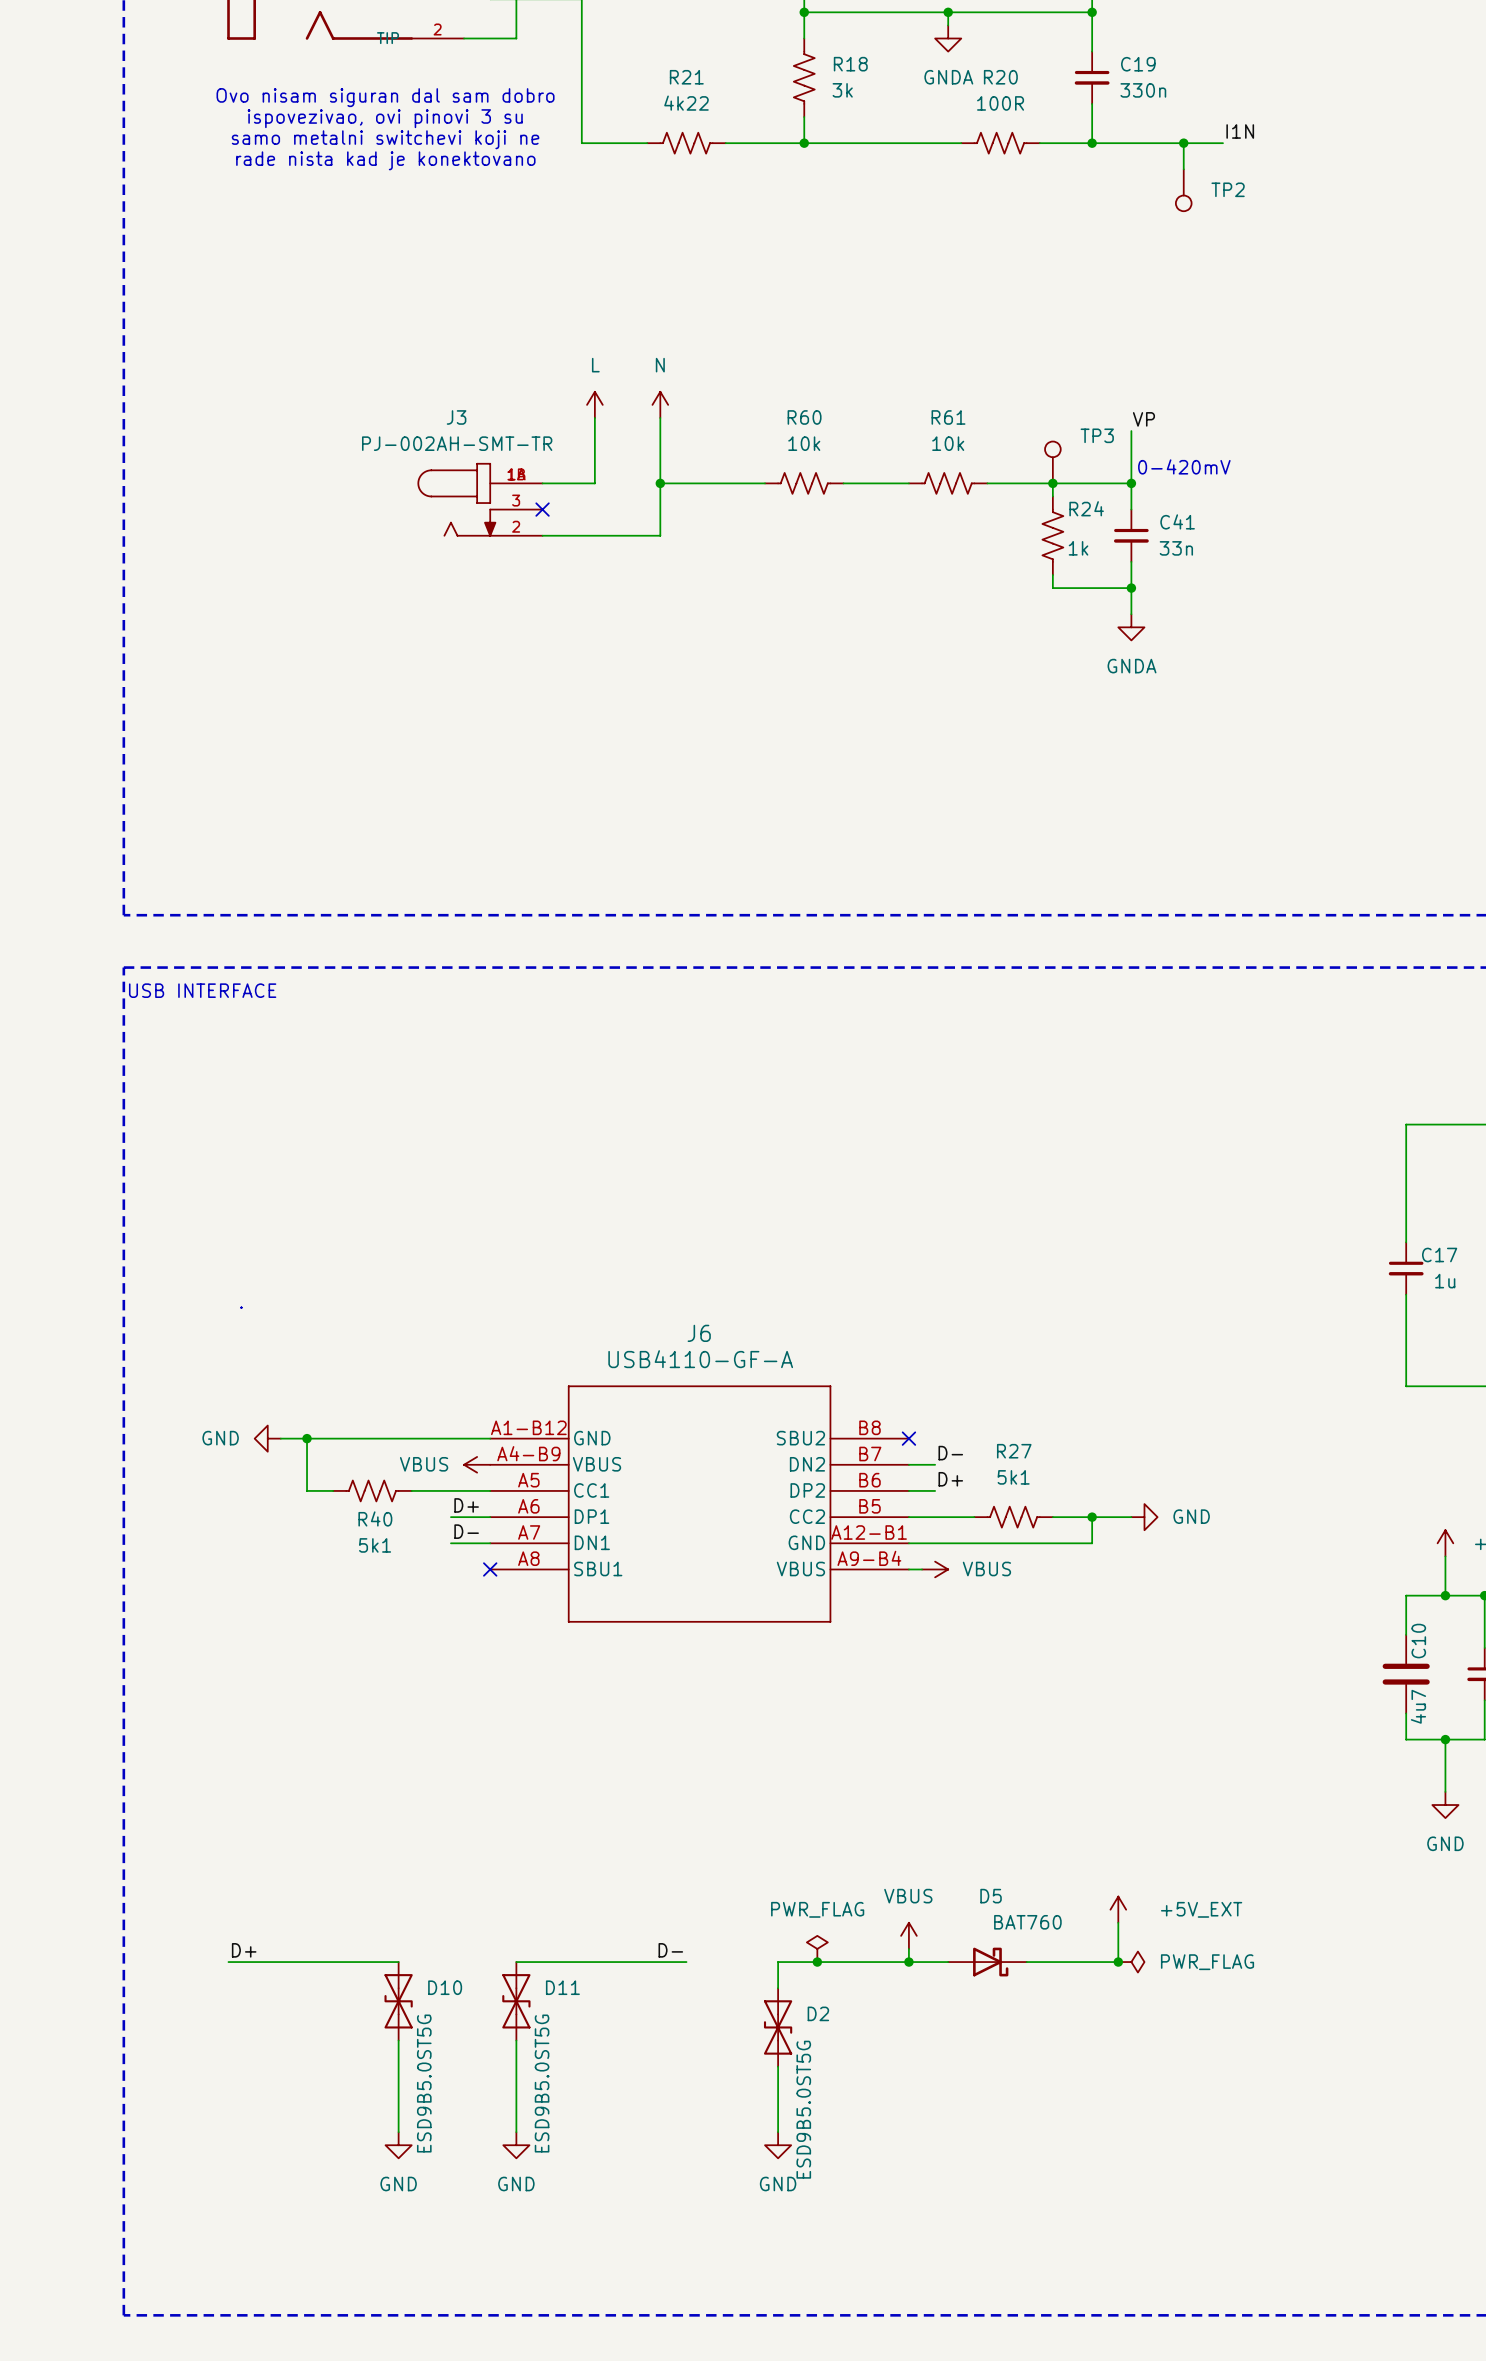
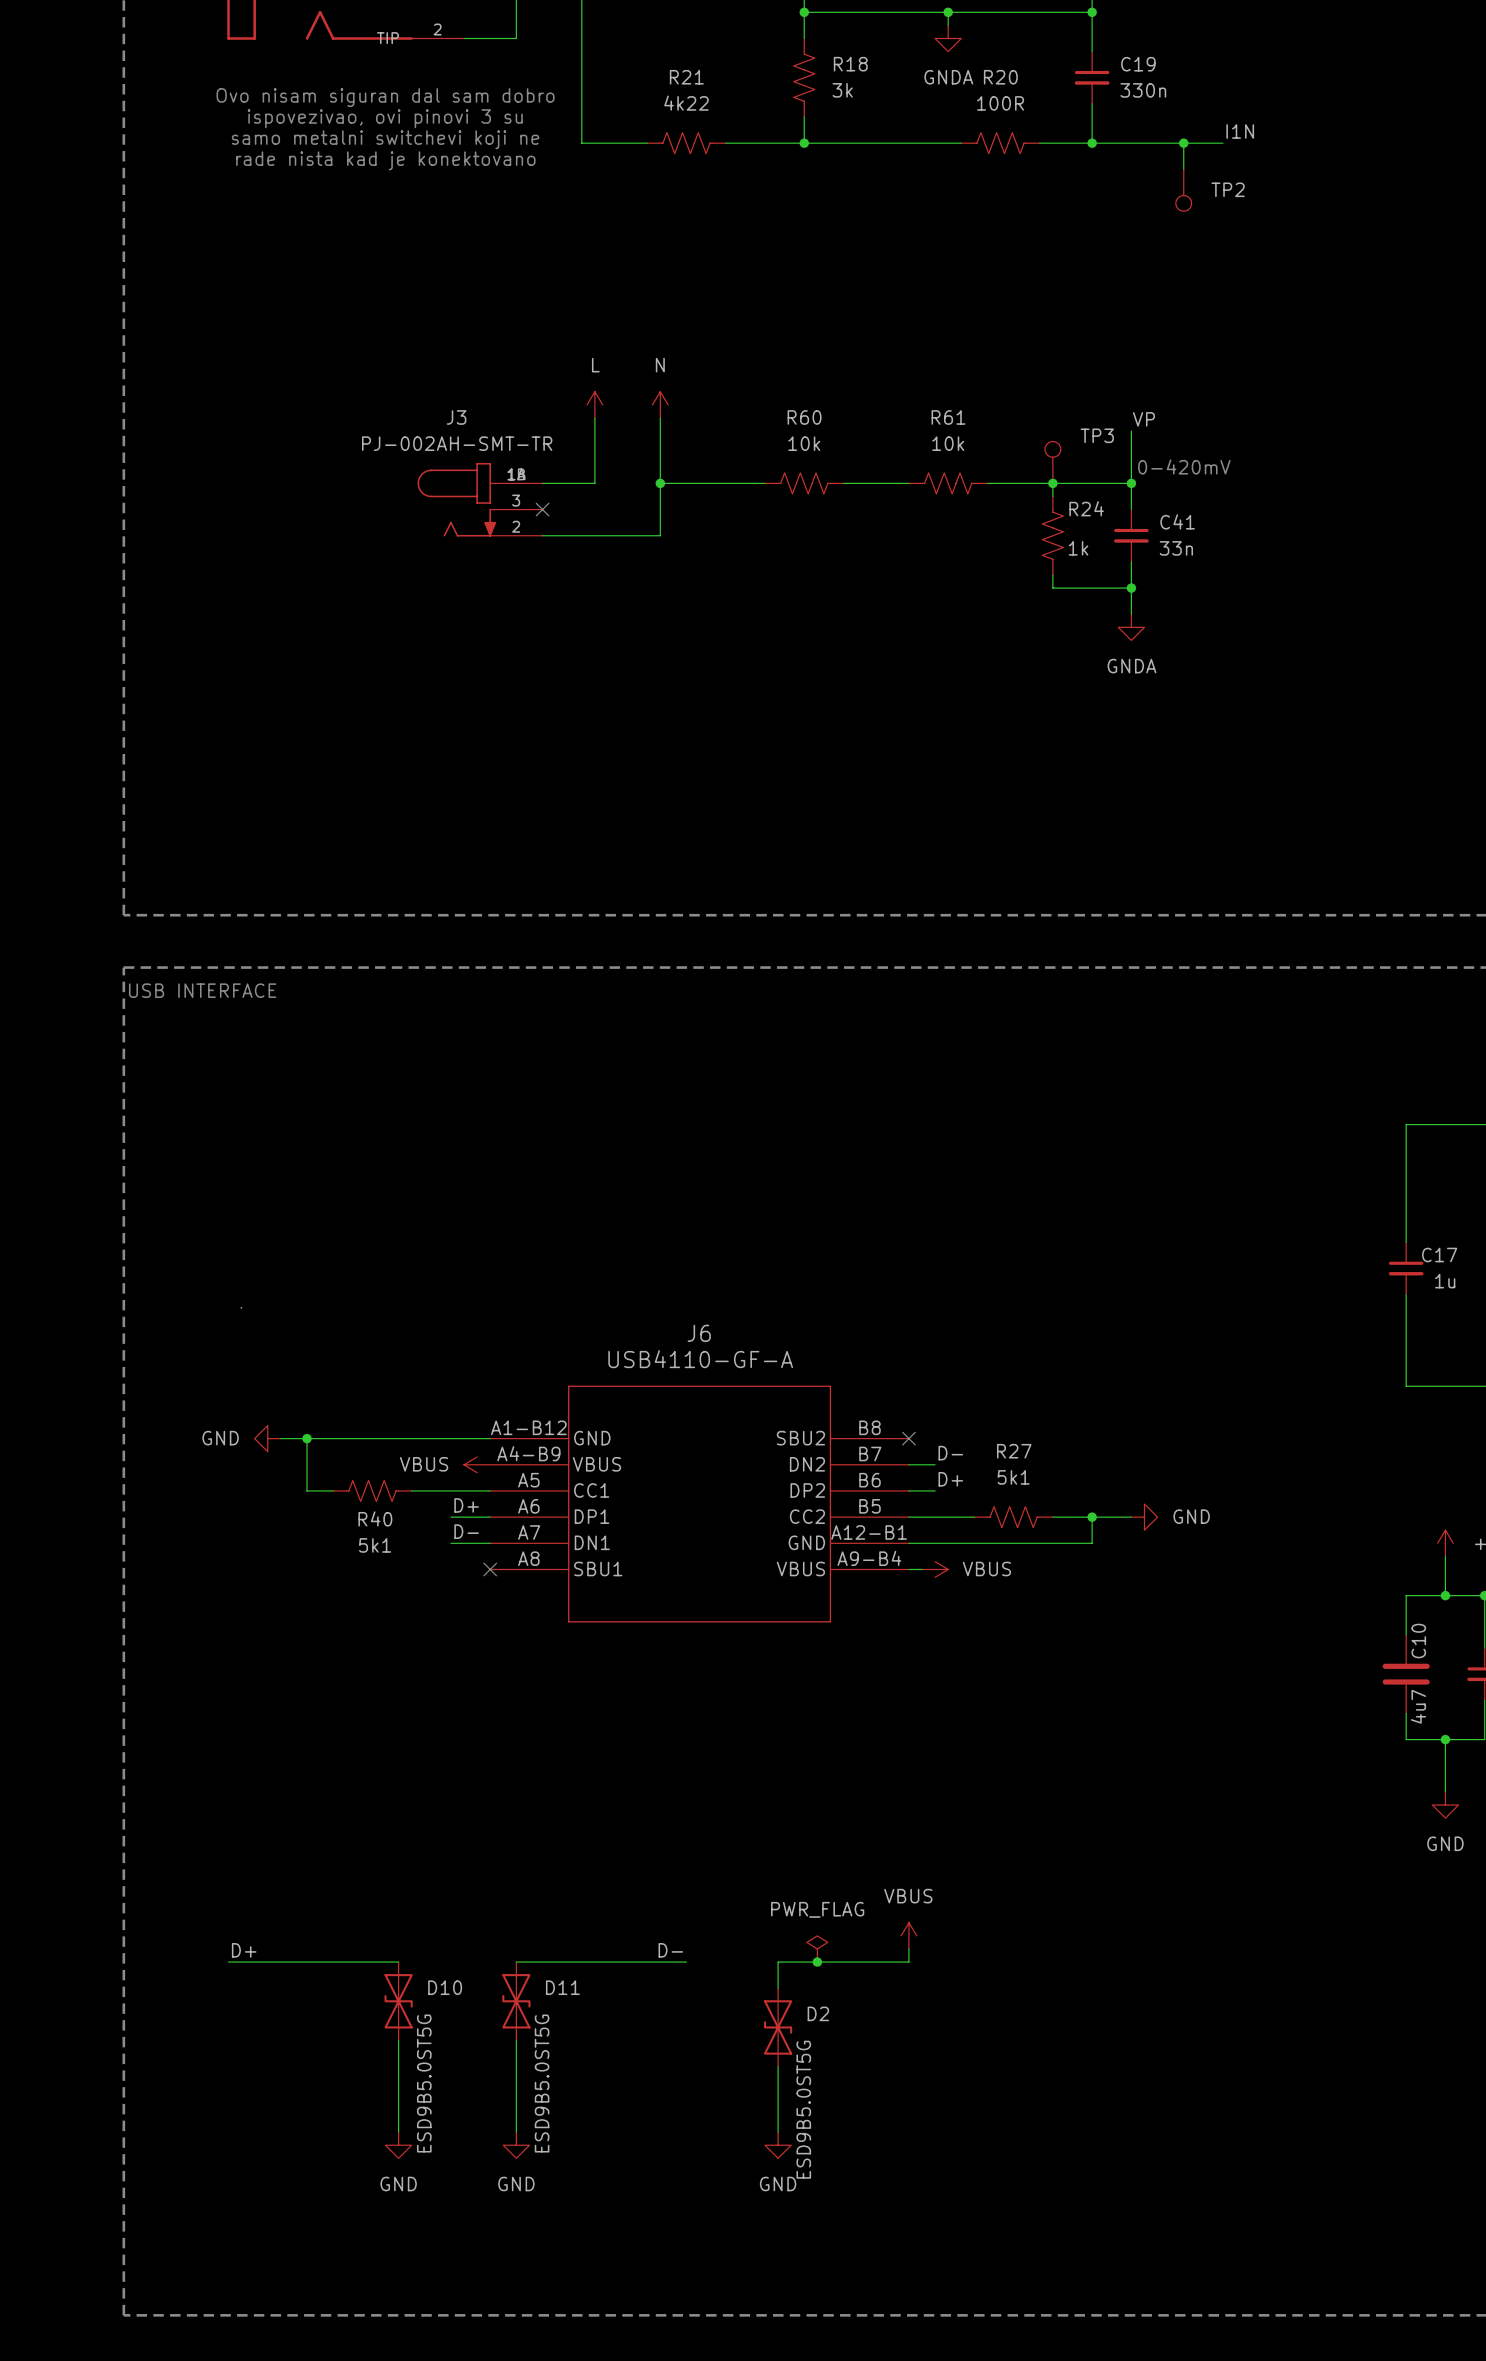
power symbol: +5V_EXT (1118, 1909) -> none
wire: (1118, 1922) (1118, 1962) (1026, 1962) -> none
wire: (908, 1962) (948, 1962) -> none
junction: (908, 1962) -> none
D5: BAT760 (987, 1962) -> none
junction: (1118, 1962) -> none
power symbol: PWR_FLAG (1131, 1962) -> none

